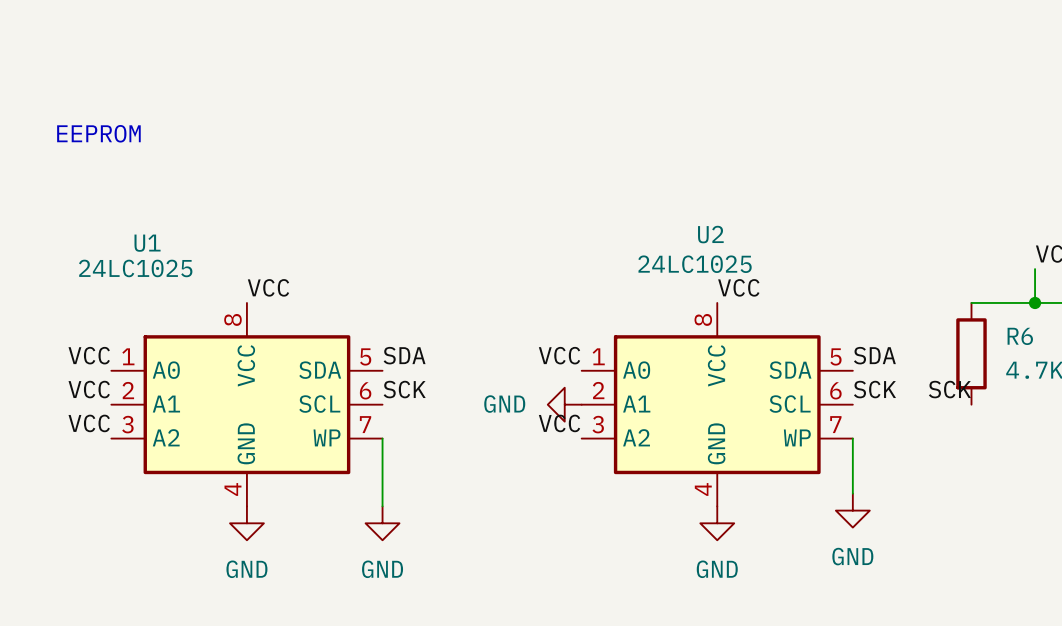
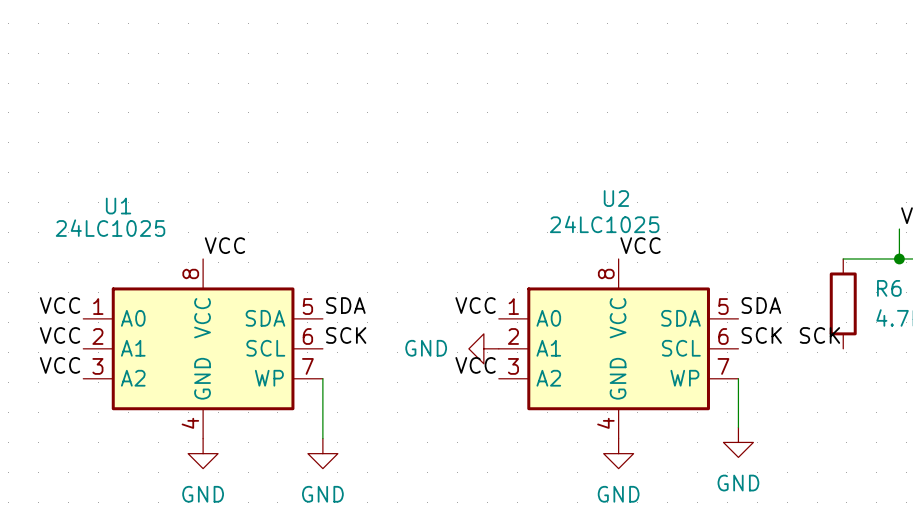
text: EEPROM (98, 133) -> none

